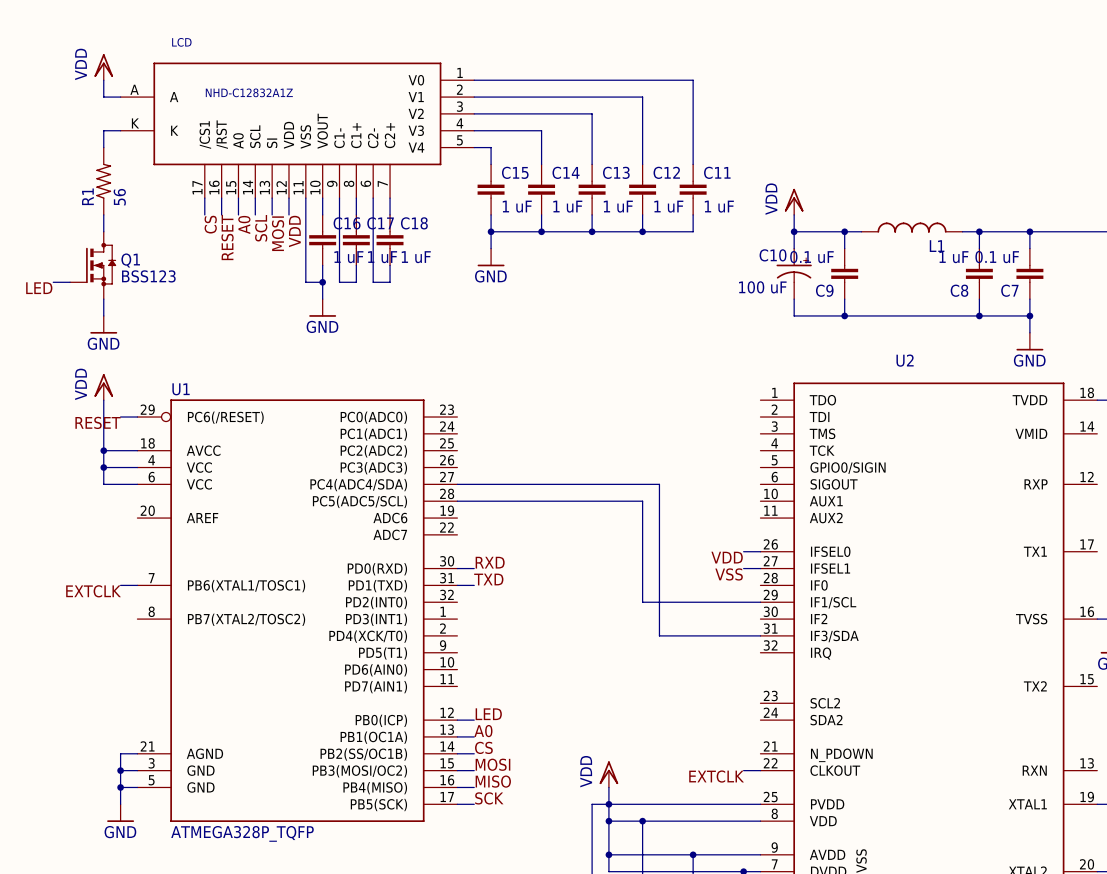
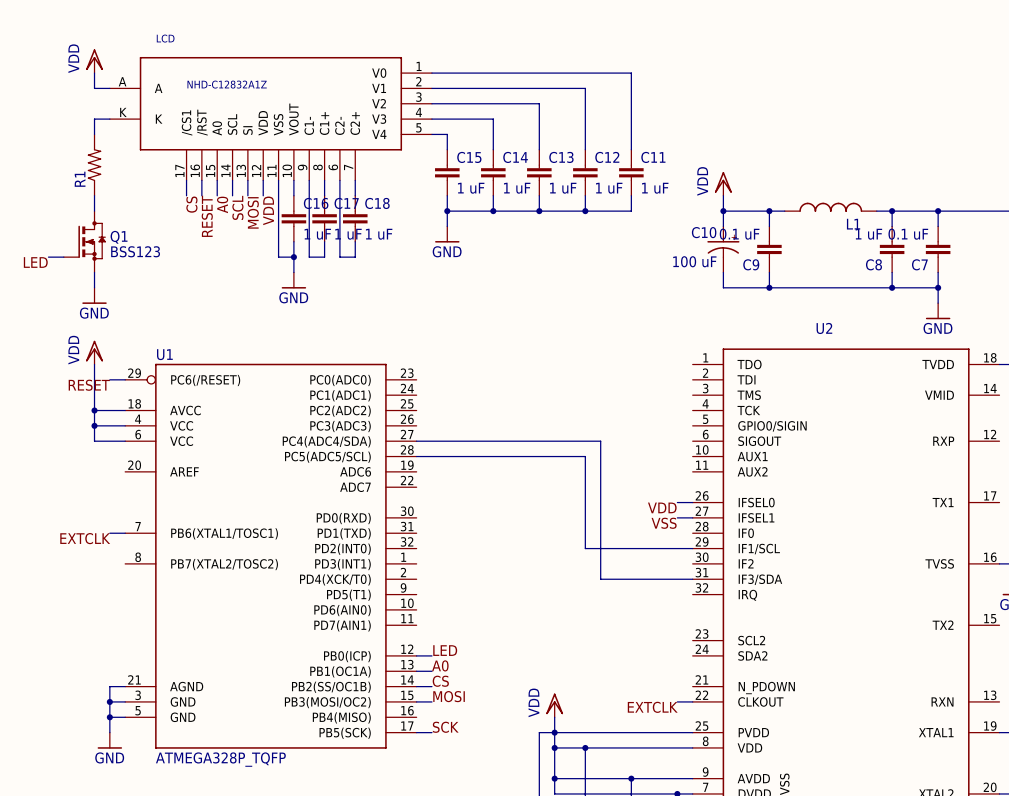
R1 value: 56 (119, 197) -> none
label: RXD (490, 562) -> none
wire: (457, 568) (474, 568) -> none
label: TXD (488, 579) -> none
wire: (457, 585) (474, 585) -> none
label: MISO (493, 781) -> none
wire: (457, 787) (474, 787) -> none

